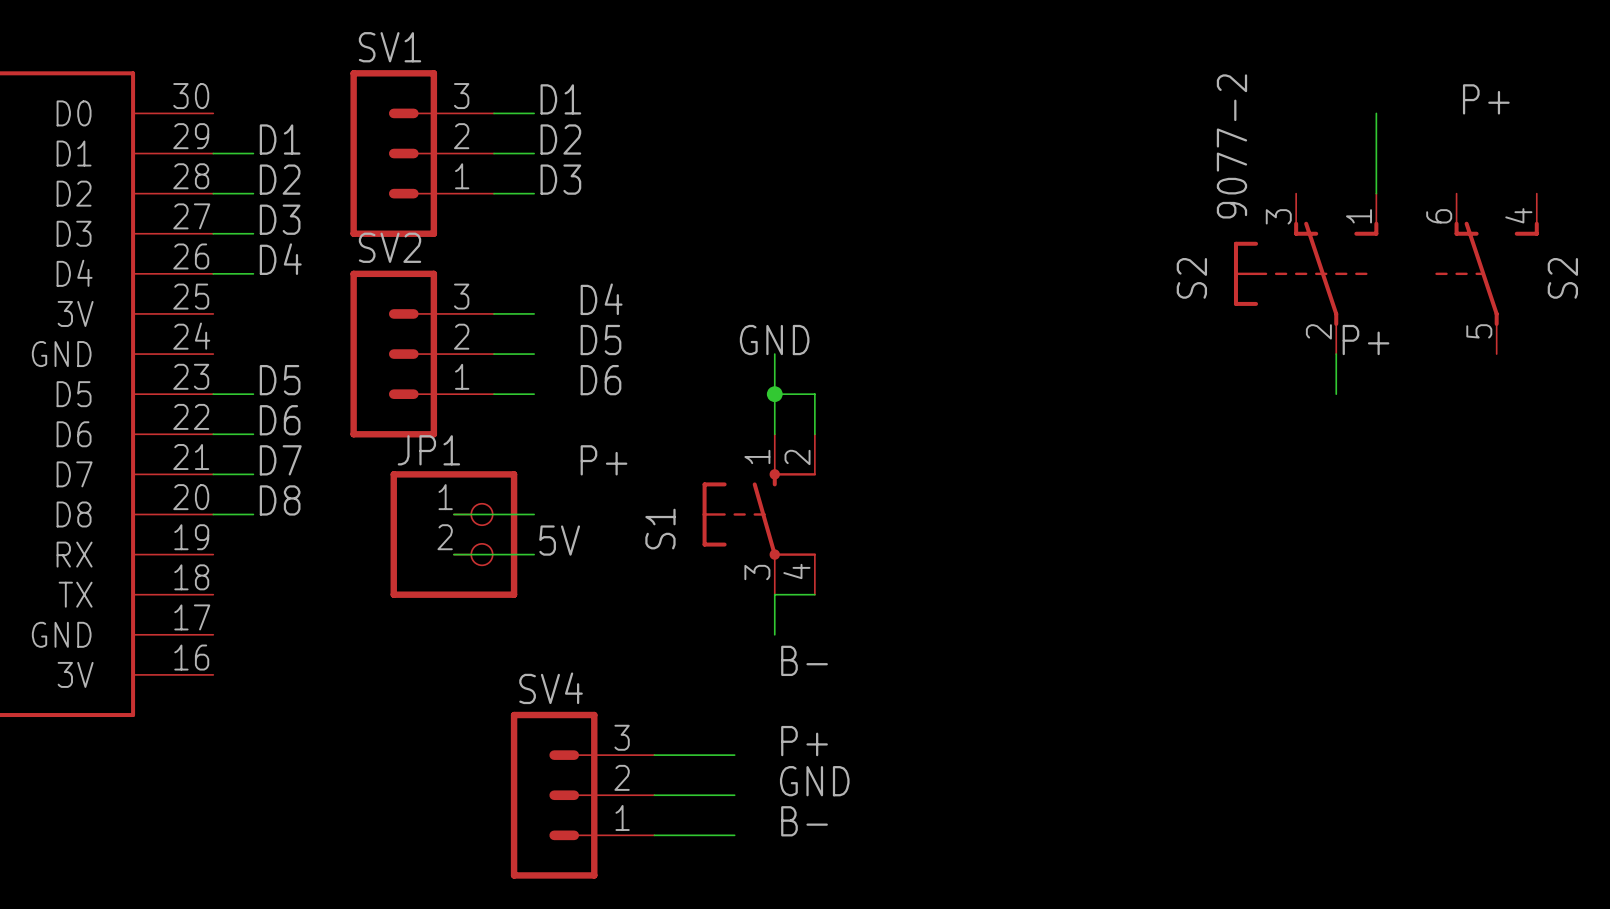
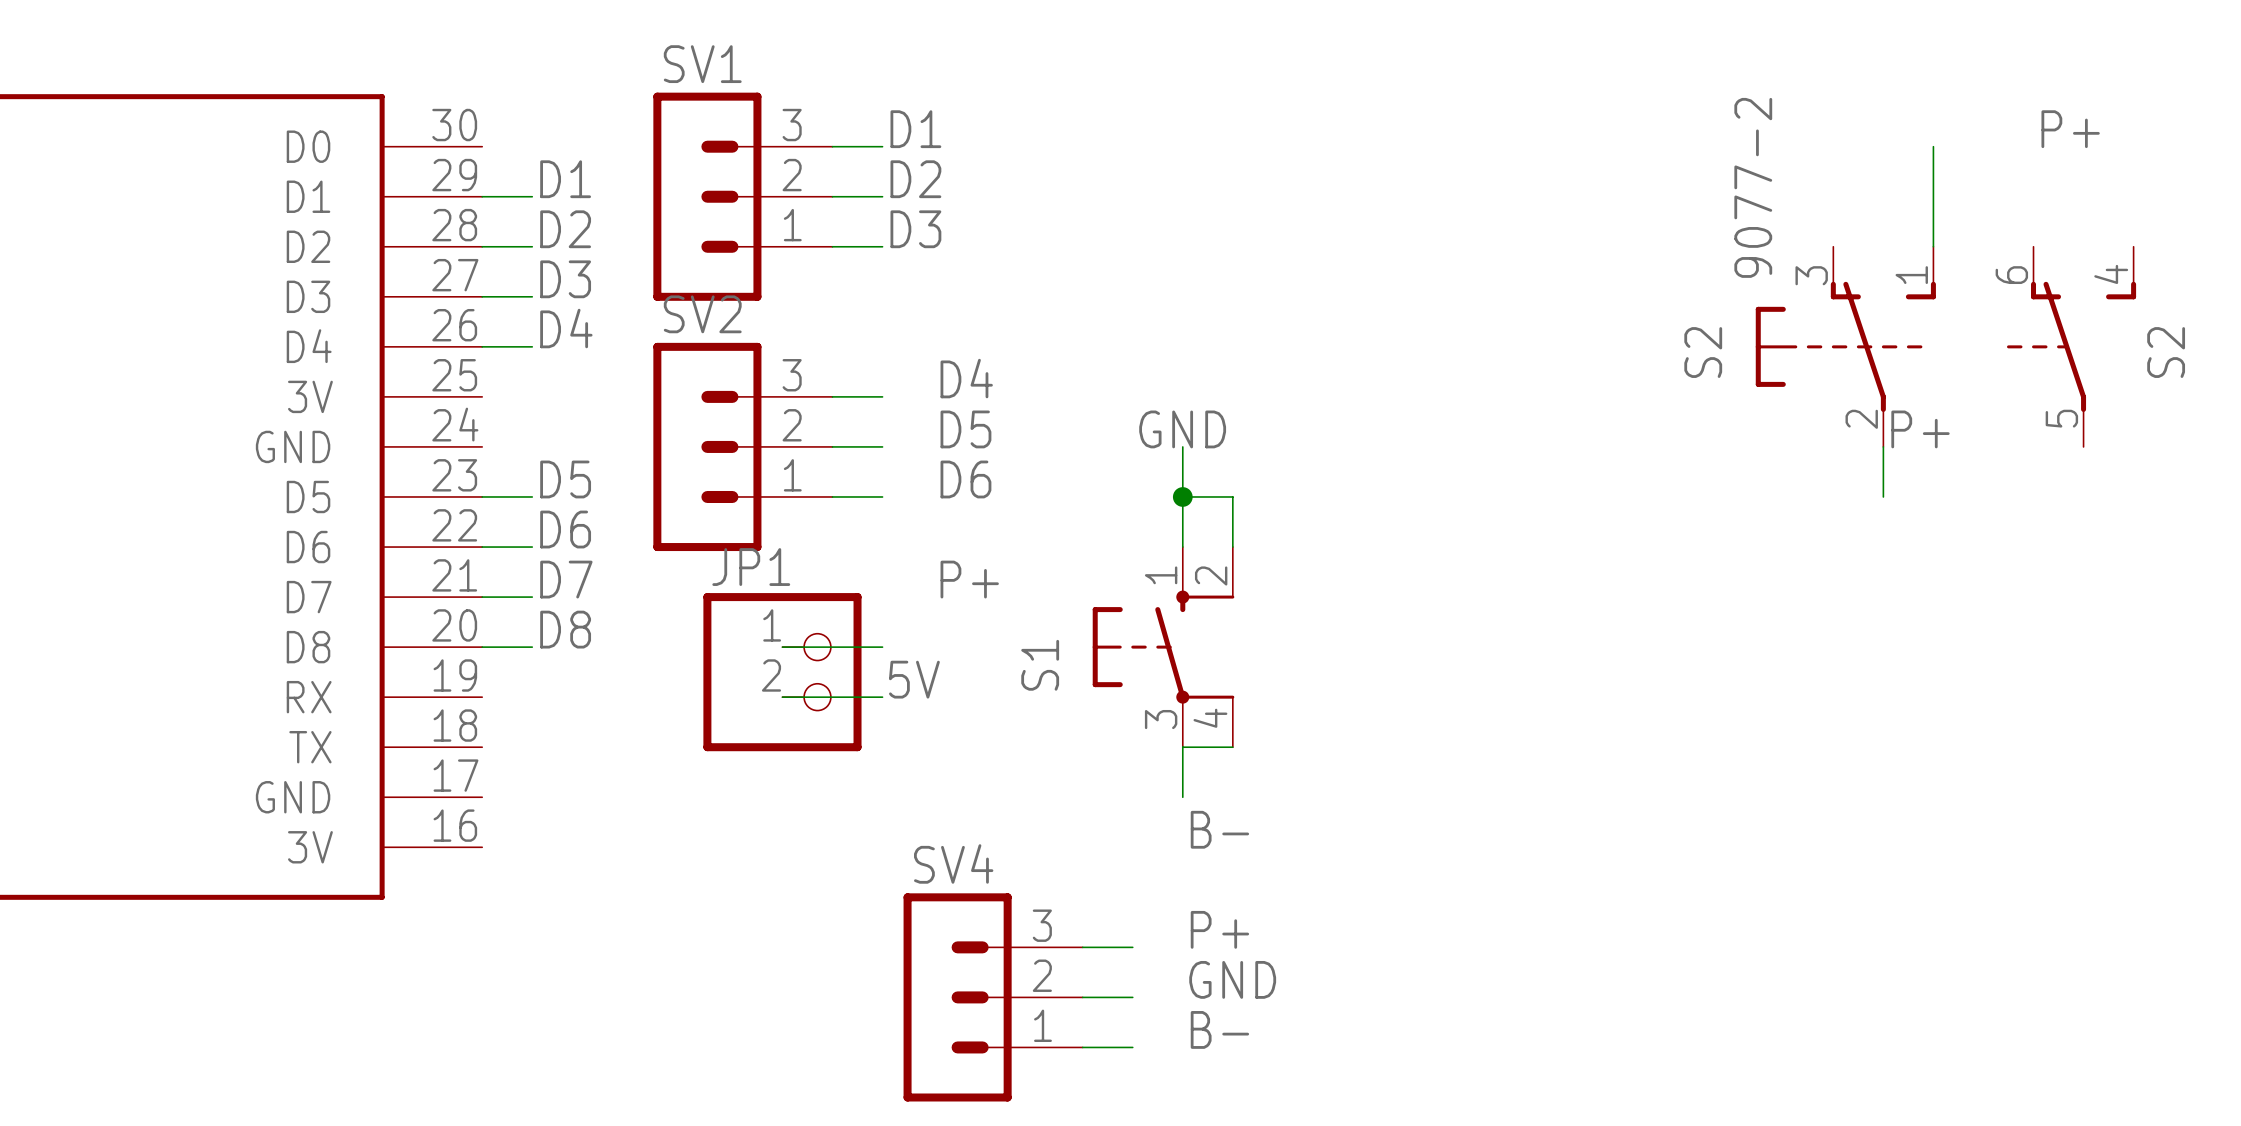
SV4 position: (582, 795) -> (993, 997)

